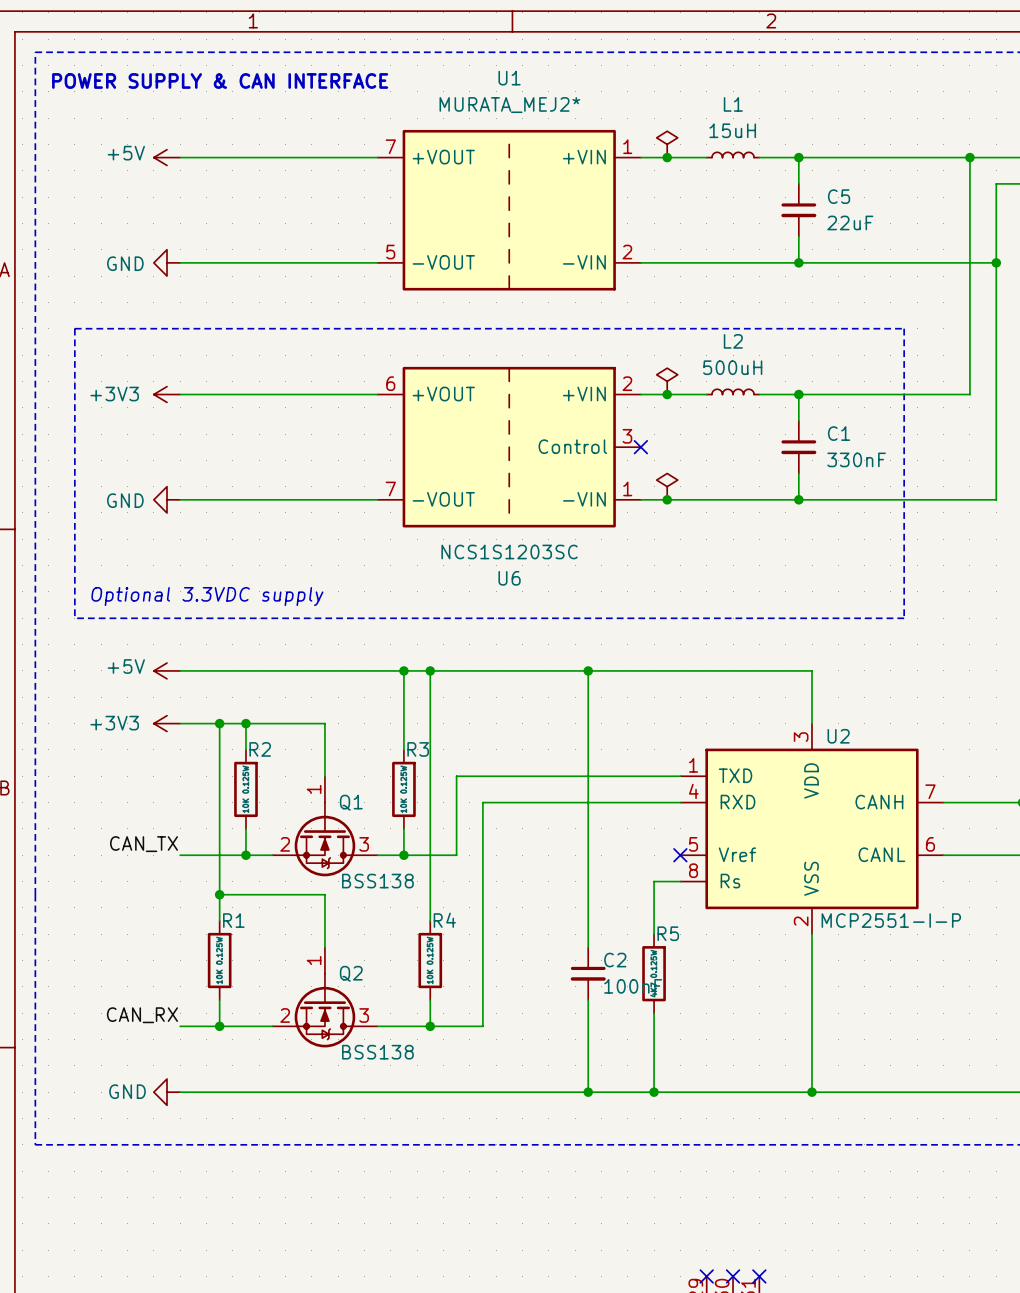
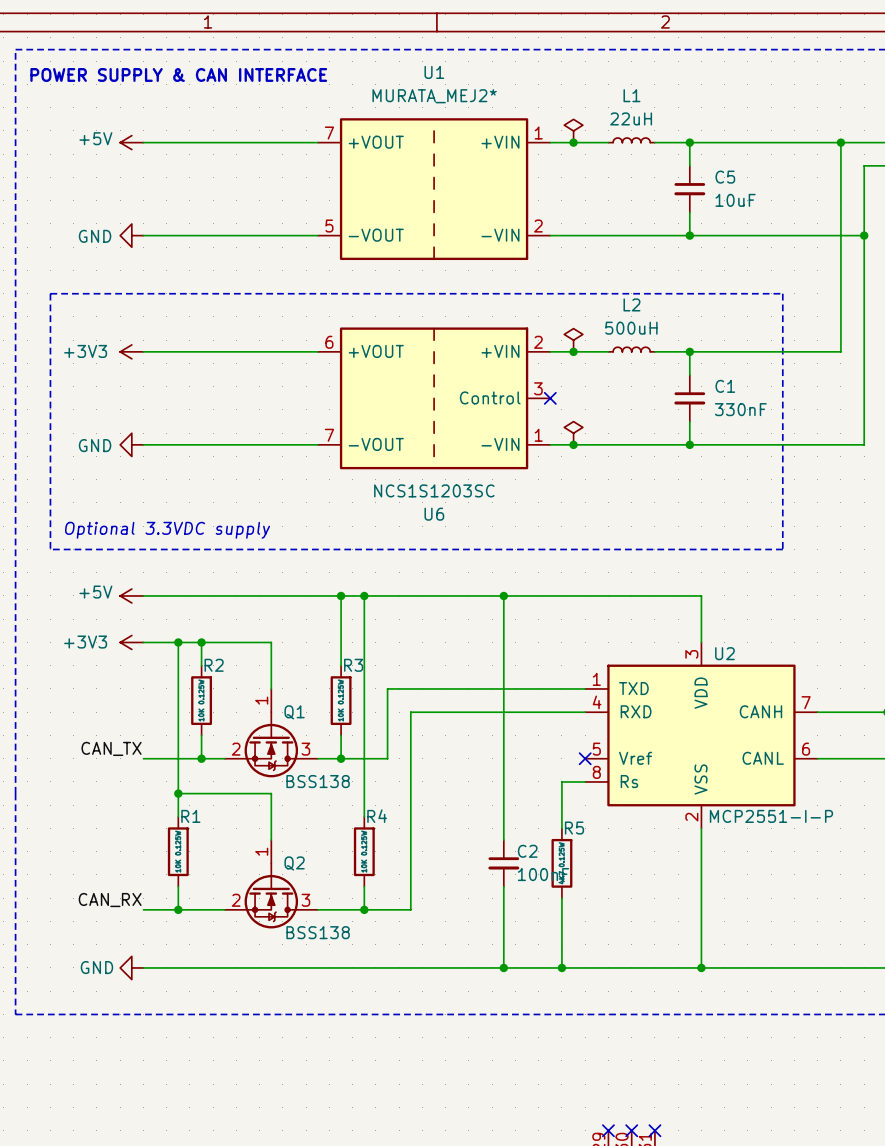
L1 value: 15uH (732, 130) -> 22uH (631, 118)
C5 value: 22uF (850, 222) -> 10uF (735, 200)

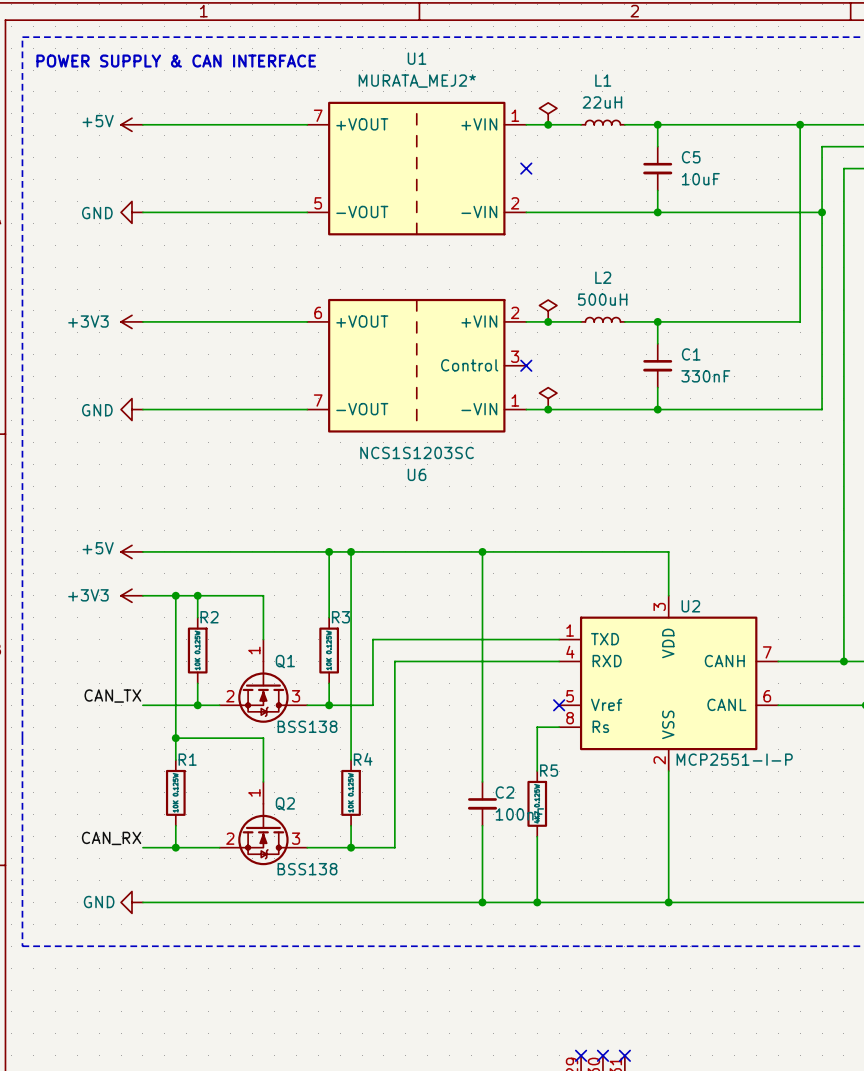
no-connect mark: none -> (526, 168)
line: (50, 293) (782, 293) (782, 549) (50, 549) (50, 293) -> none
text: Optional 3.3VDC supply (167, 530) -> none

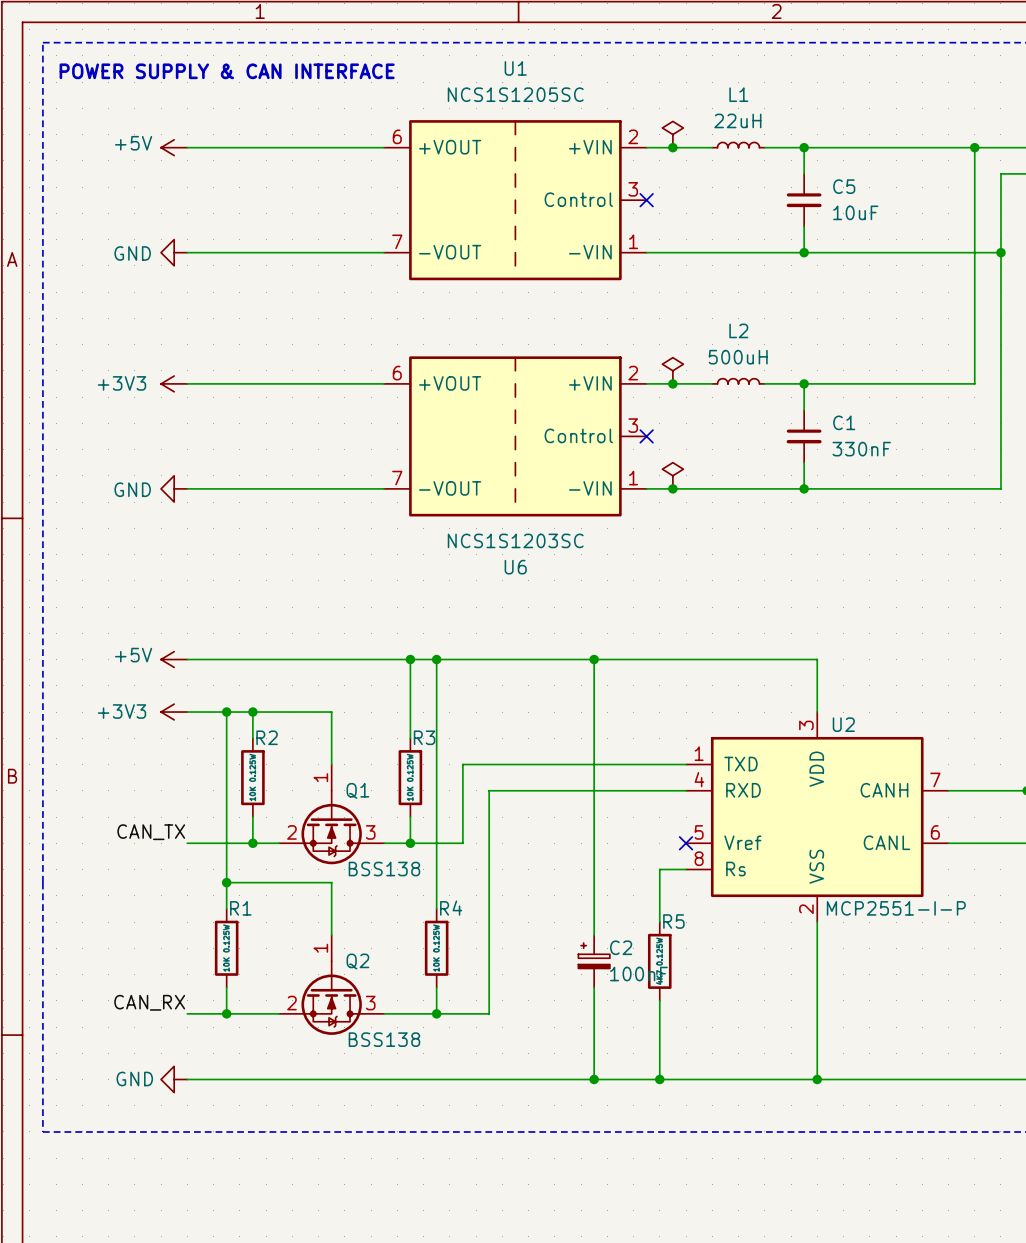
U1 value: MURATA_MEJ2* (417, 81) -> NCS1S1205SC (515, 94)
U1 symbol: [307, 101, 527, 236] -> [384, 120, 647, 281]
C2 symbol: [467, 781, 498, 826] -> [578, 935, 610, 988]

